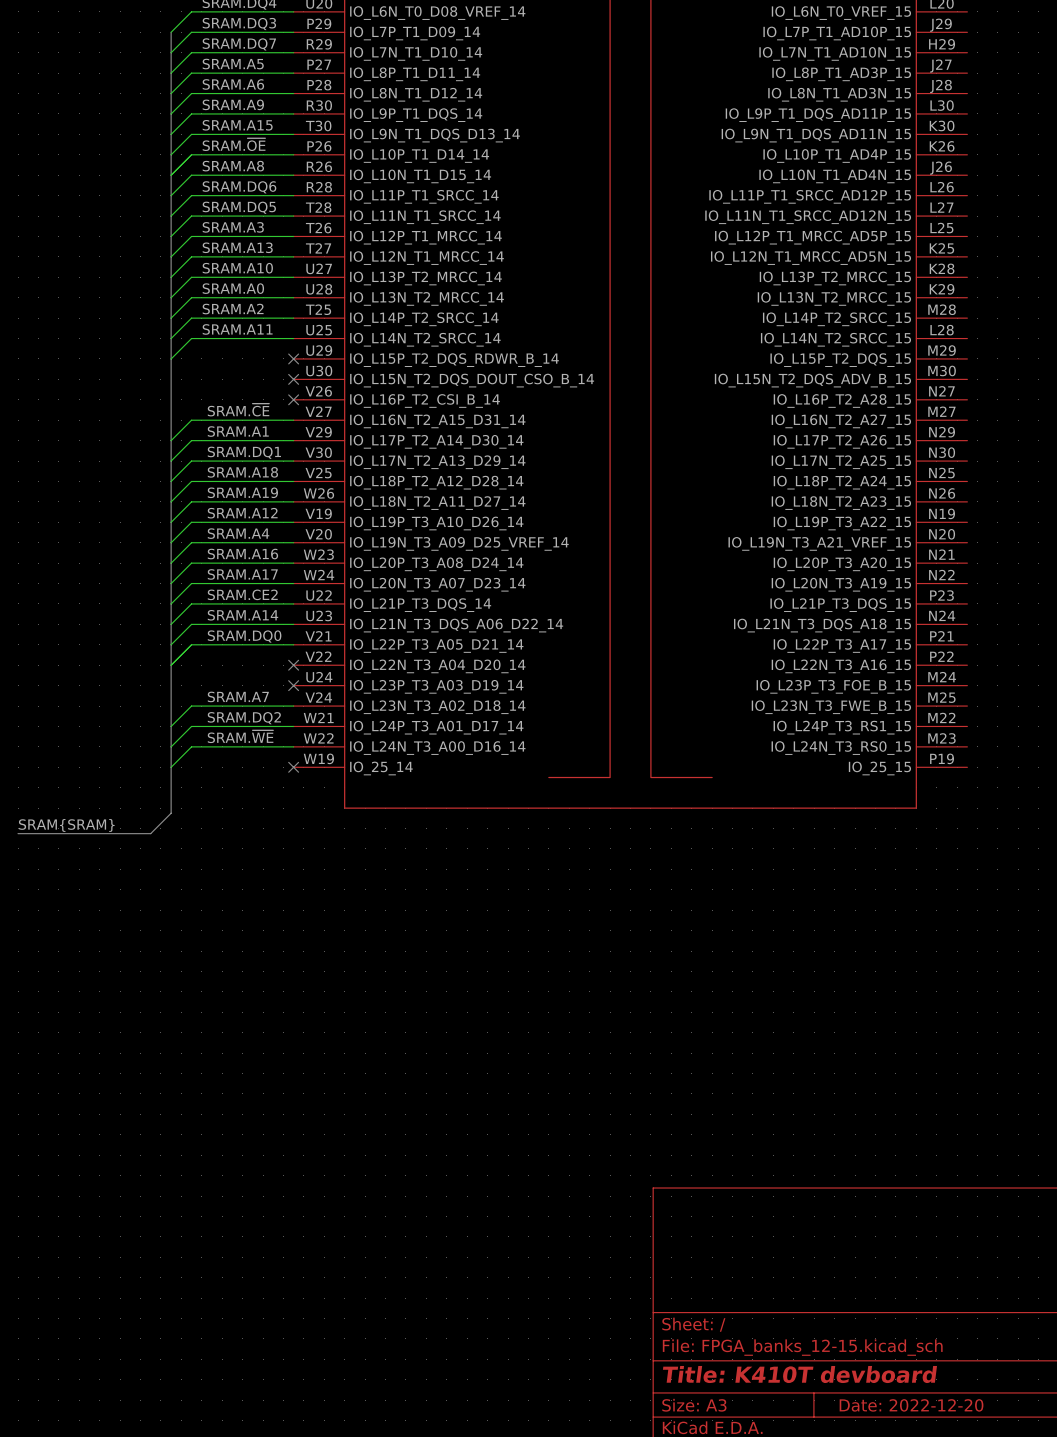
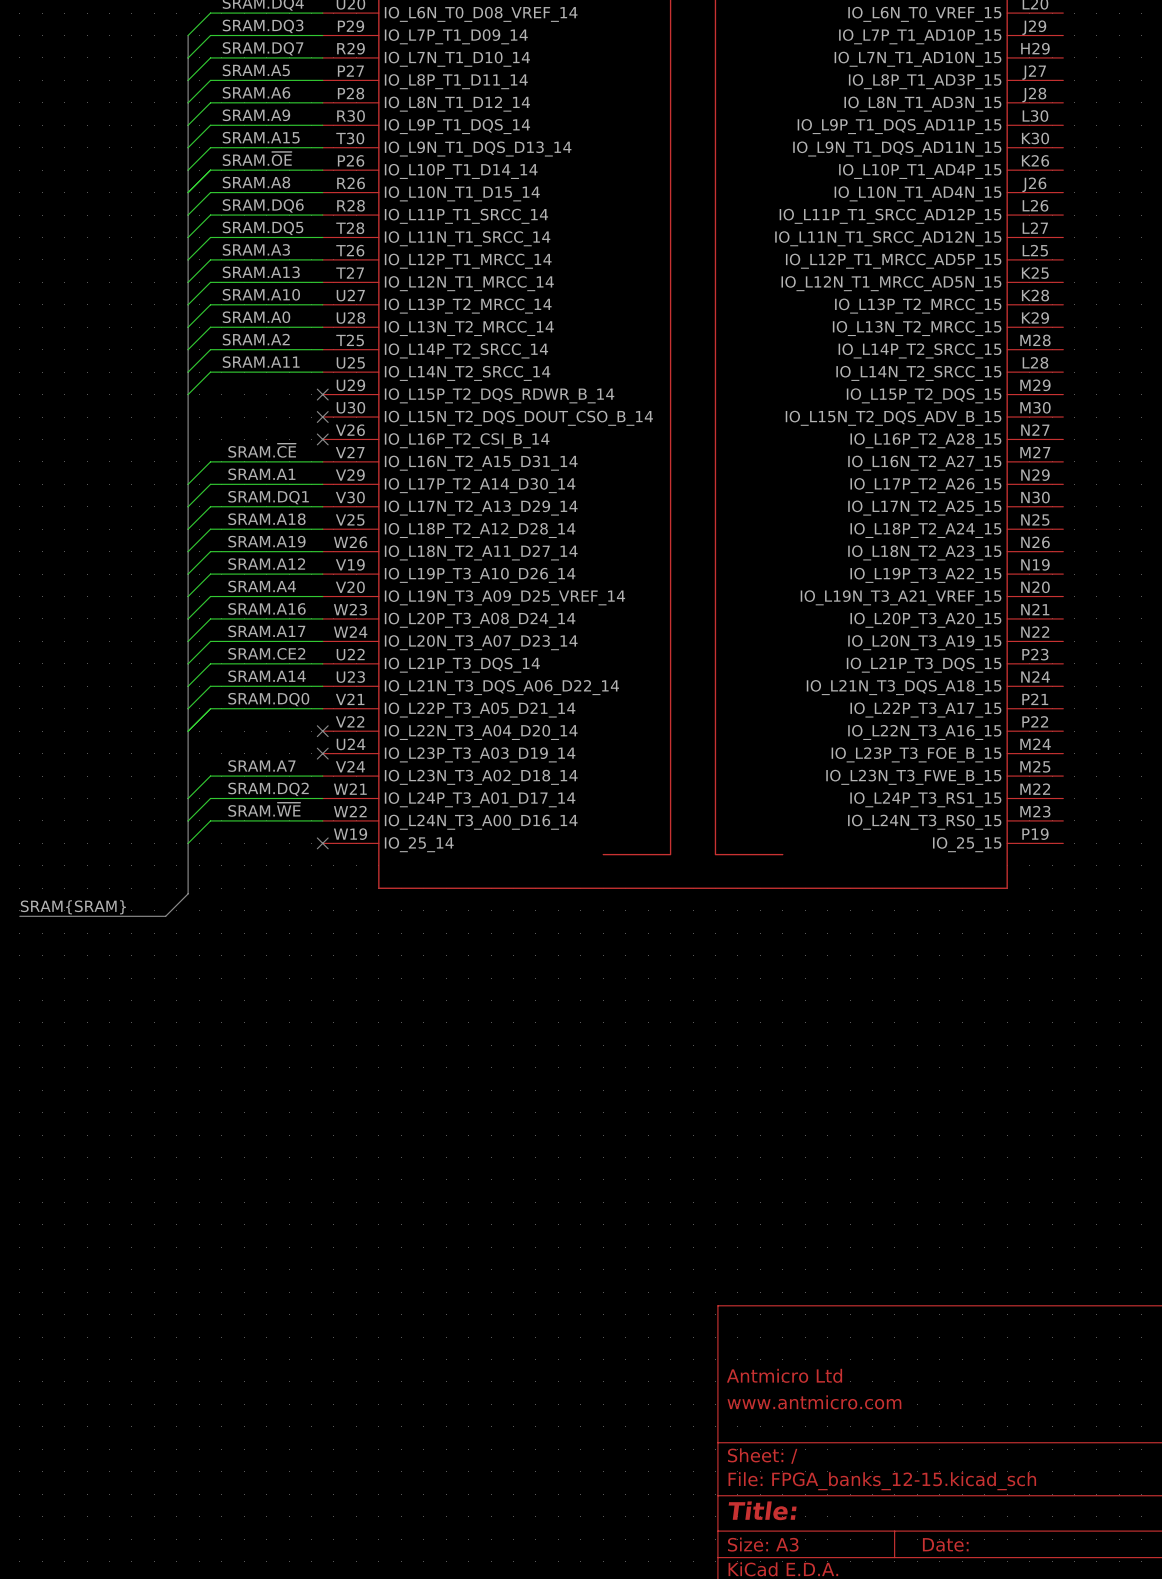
title block: none -> Antmicro Ltd (784, 1375)
title block: none -> www.antmicro.com (814, 1402)
title block: Title: K410T devboard (799, 1374) -> Title: (762, 1510)
title block: Date: 2022-12-20 (911, 1405) -> Date: (945, 1544)

